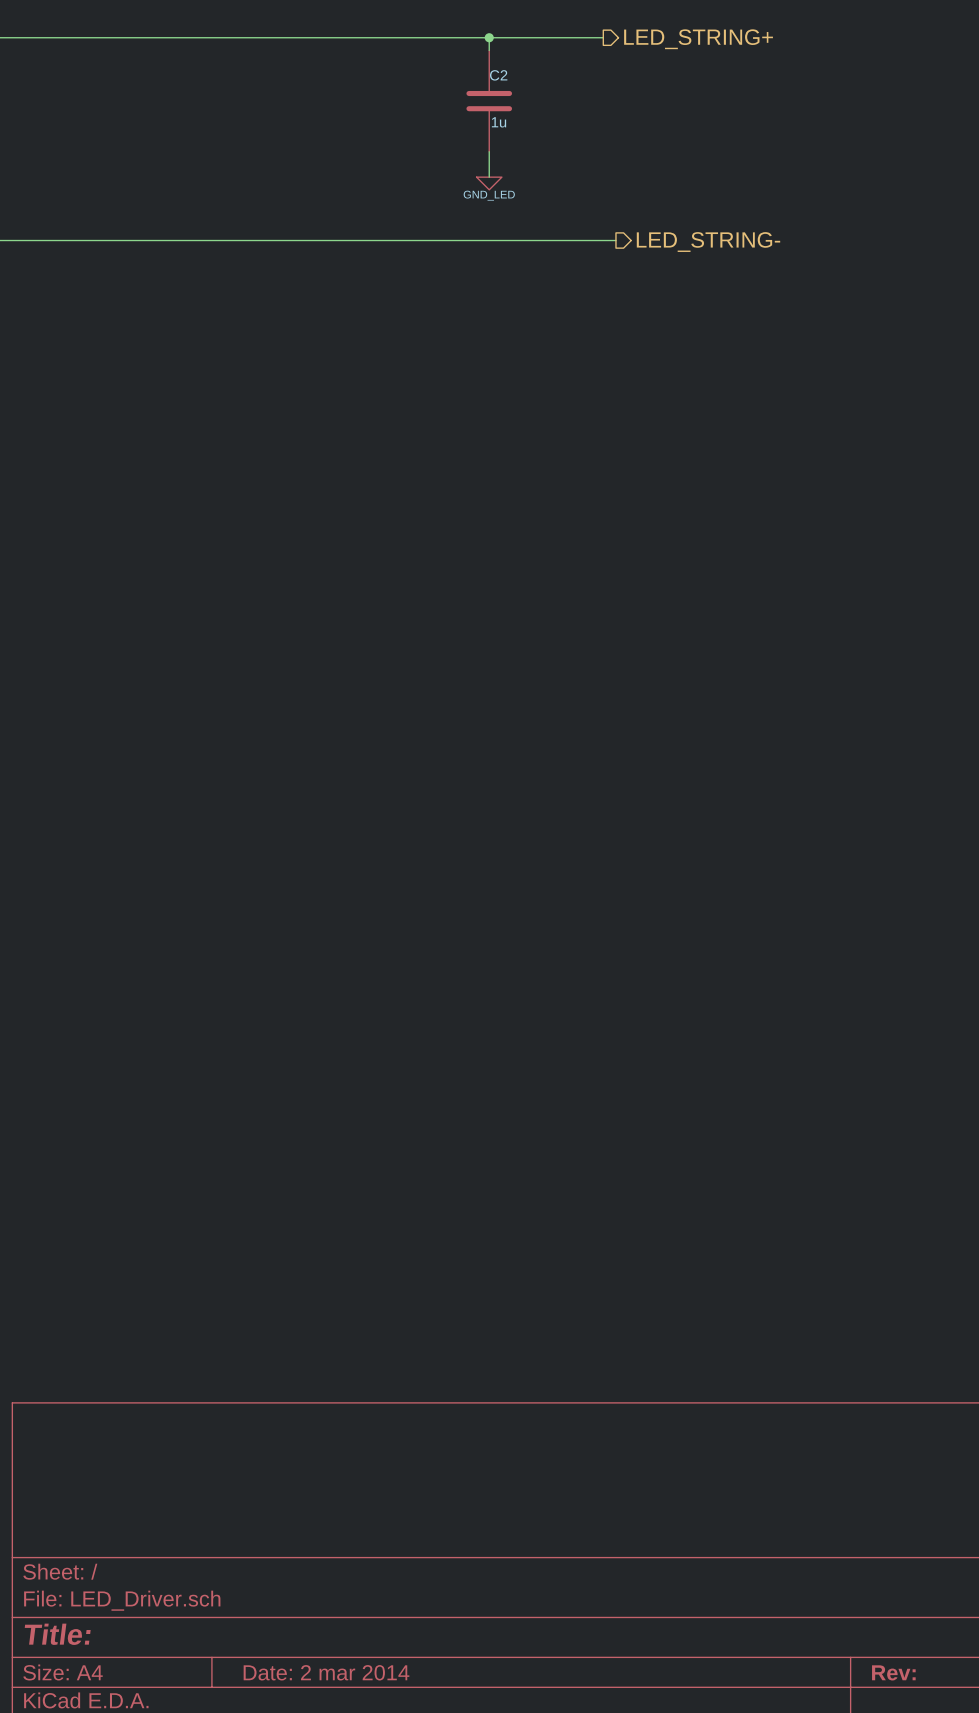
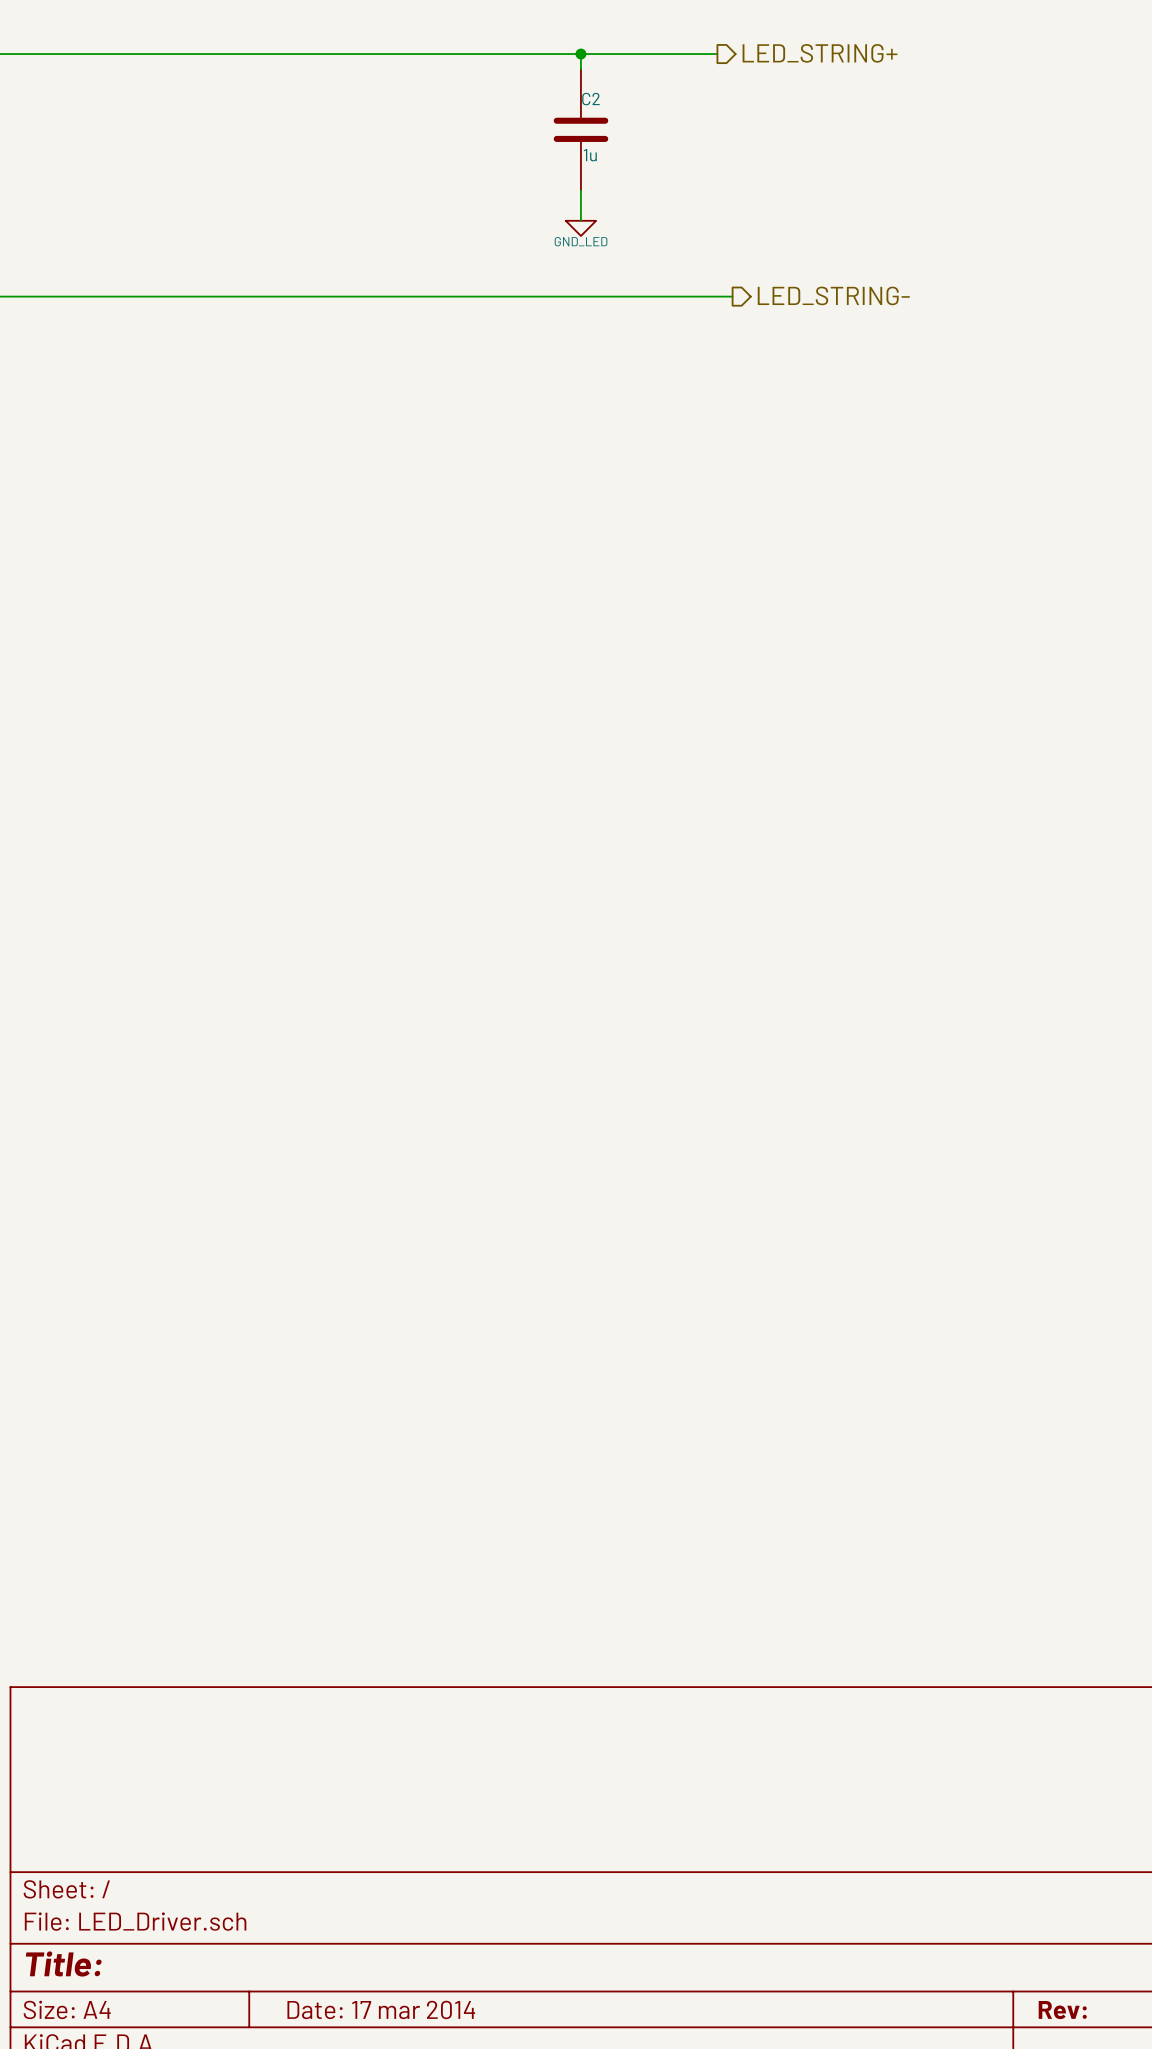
title block: Date: 2 mar 2014 (326, 1672) -> Date: 17 mar 2014 (381, 2009)

